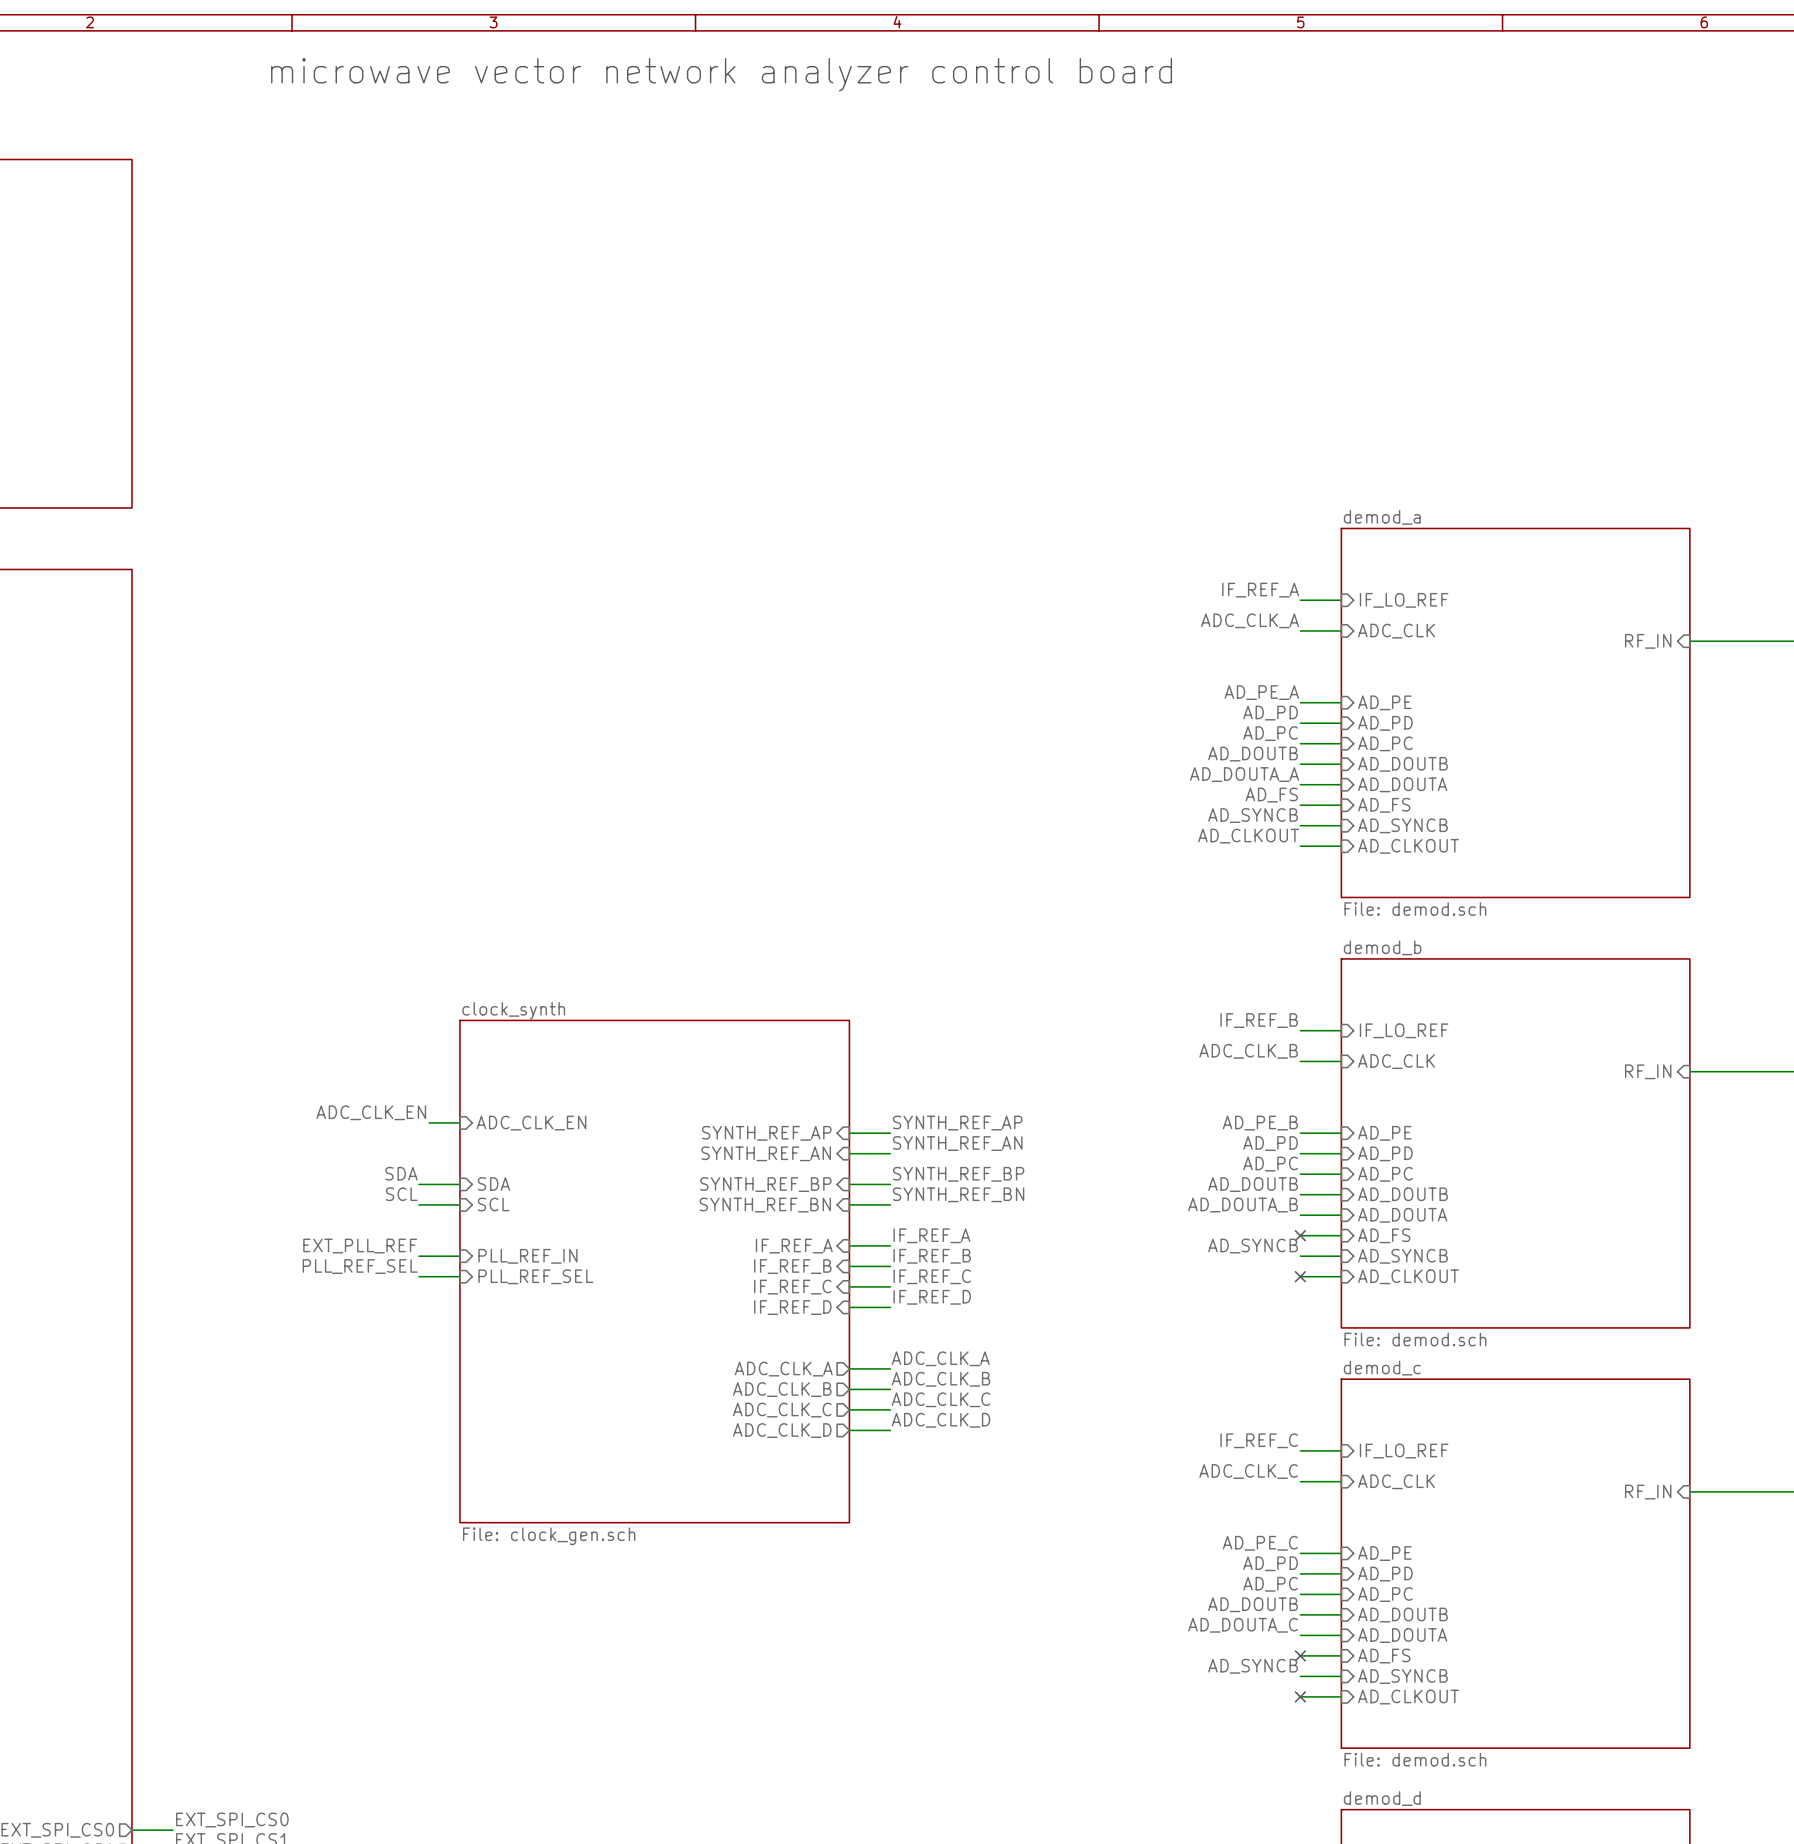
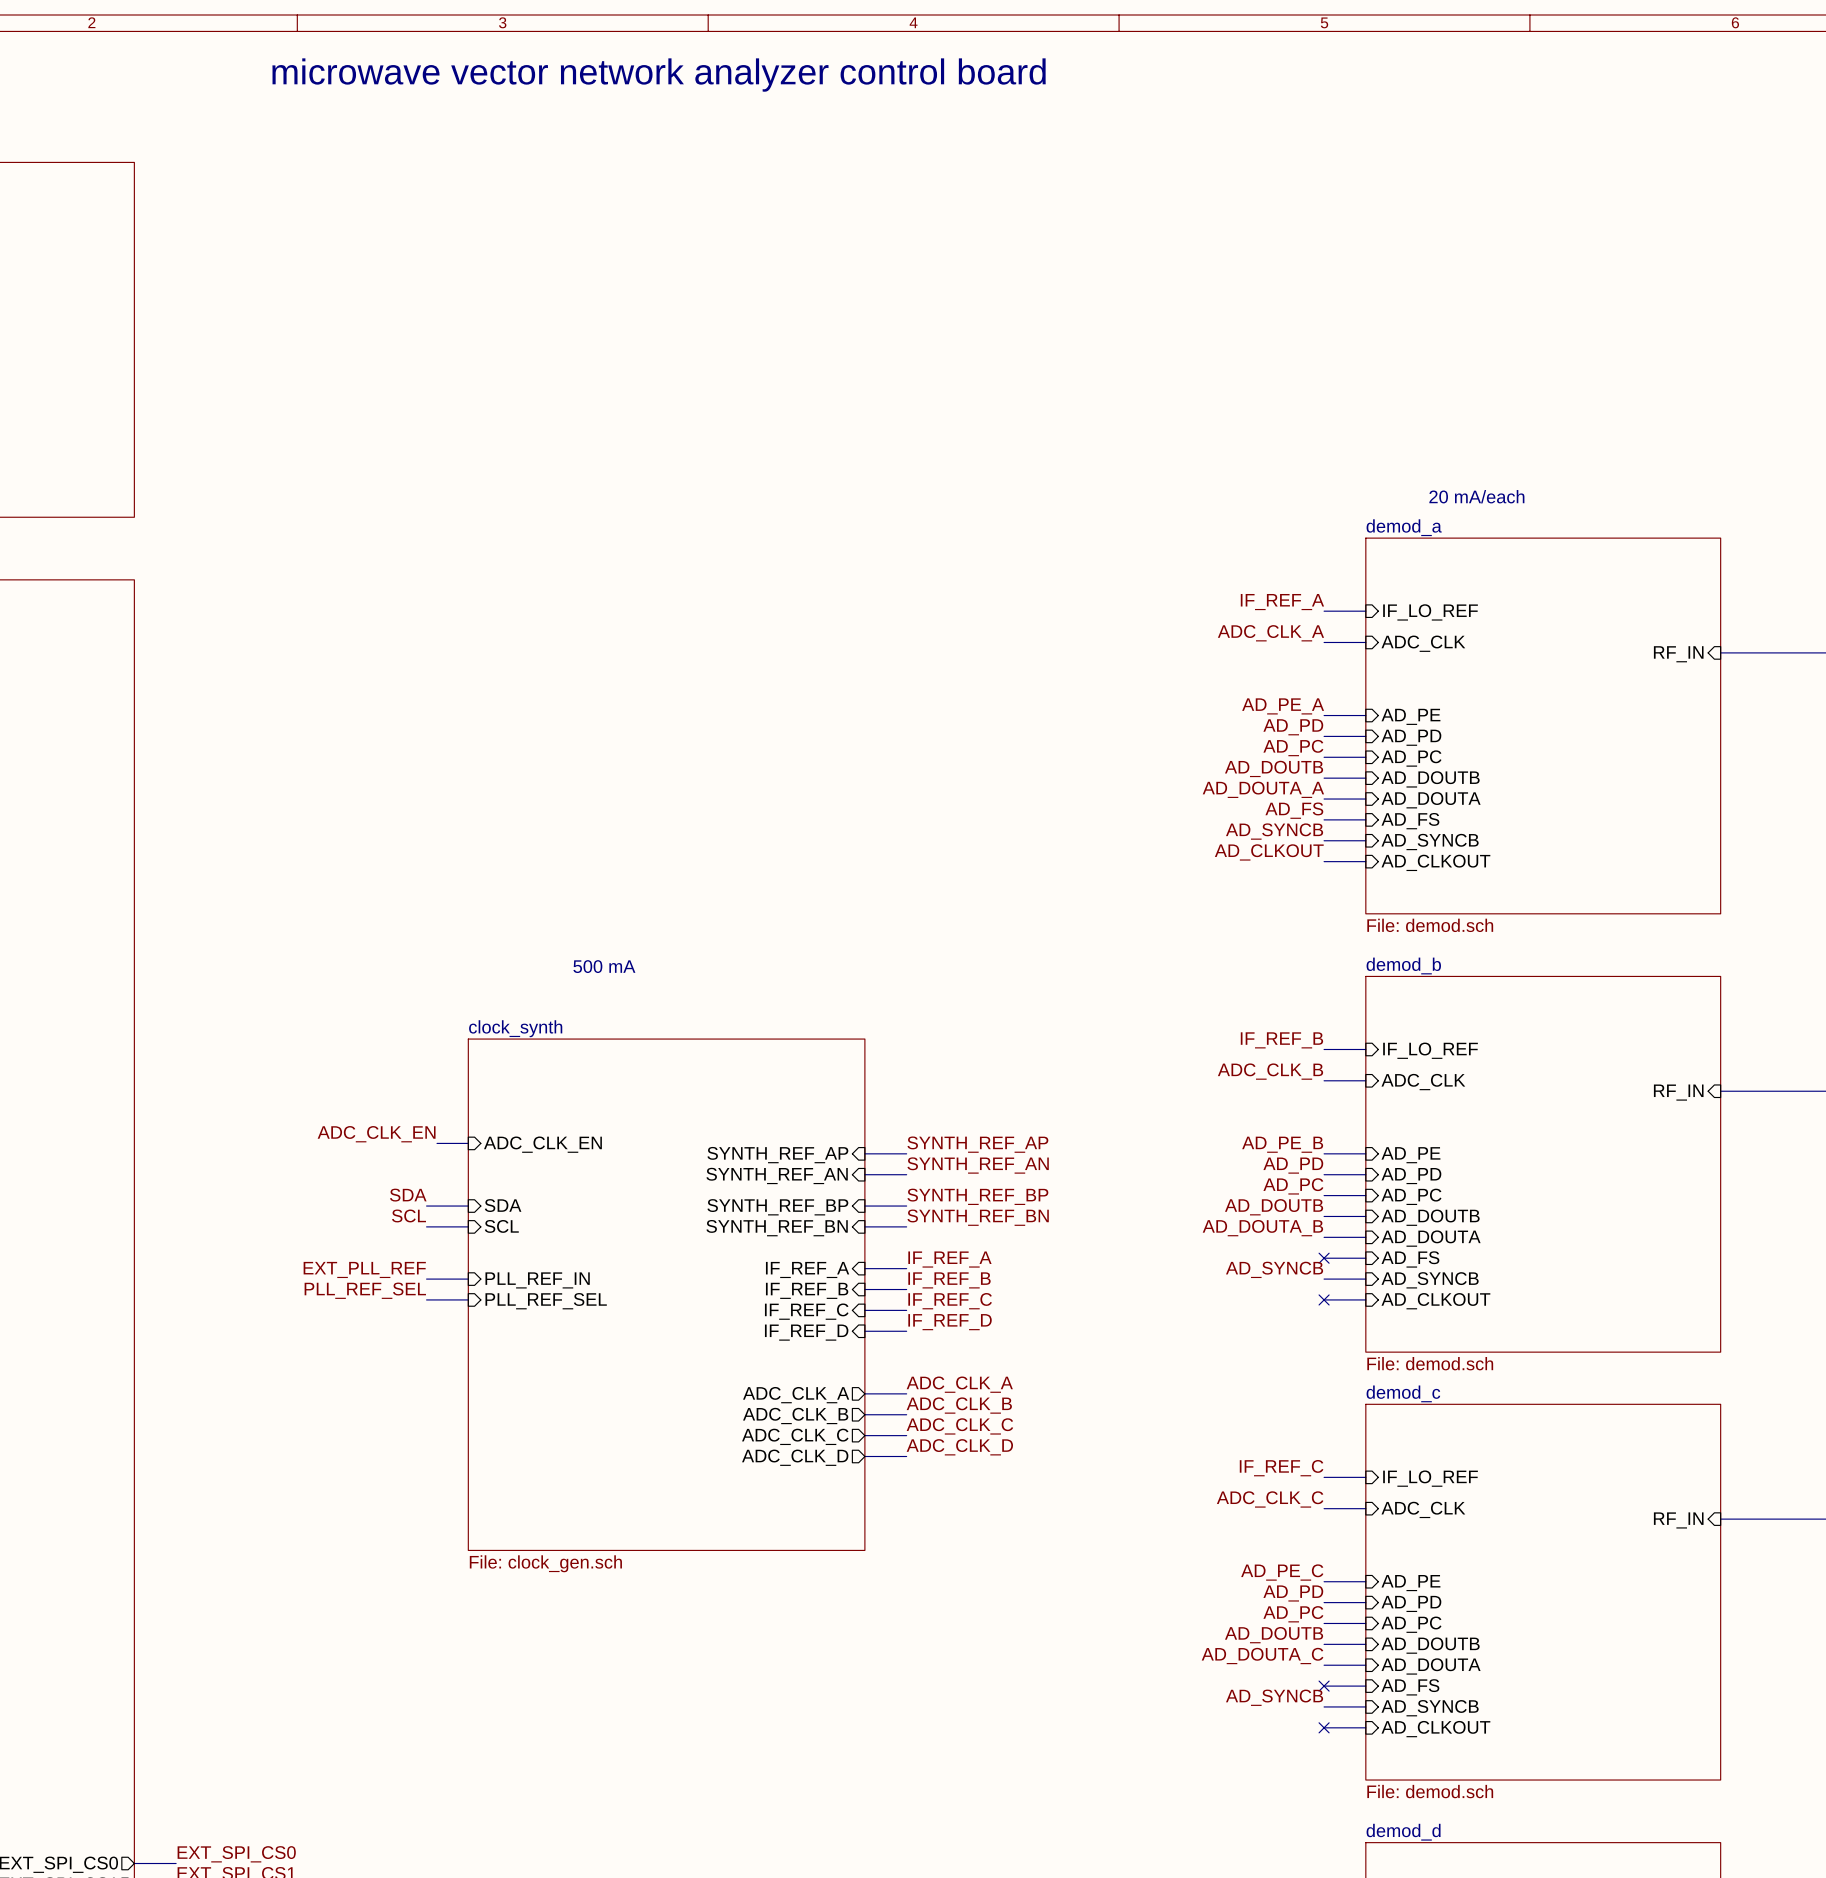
text: none -> 20 mA/each (1476, 496)
text: none -> 500 mA (604, 966)

